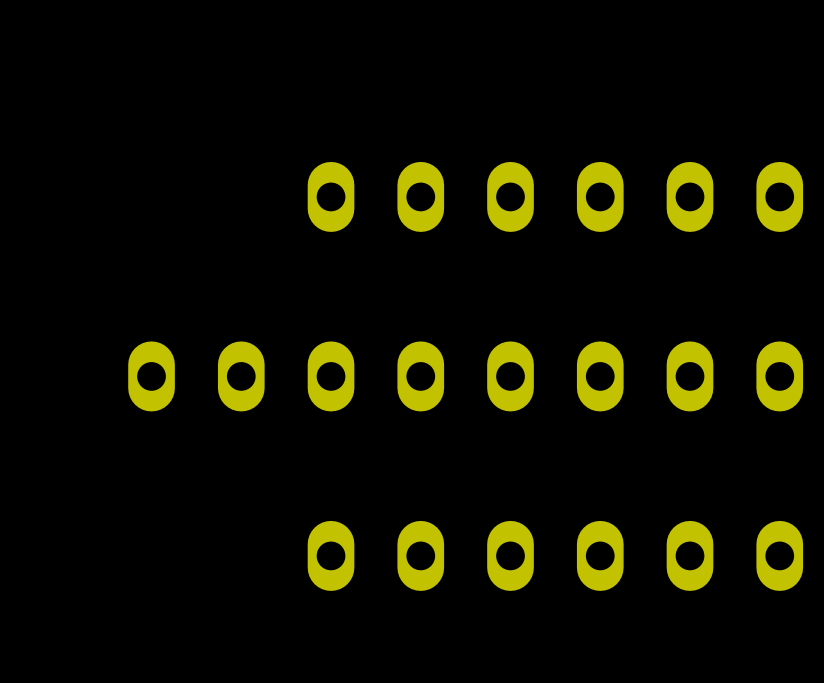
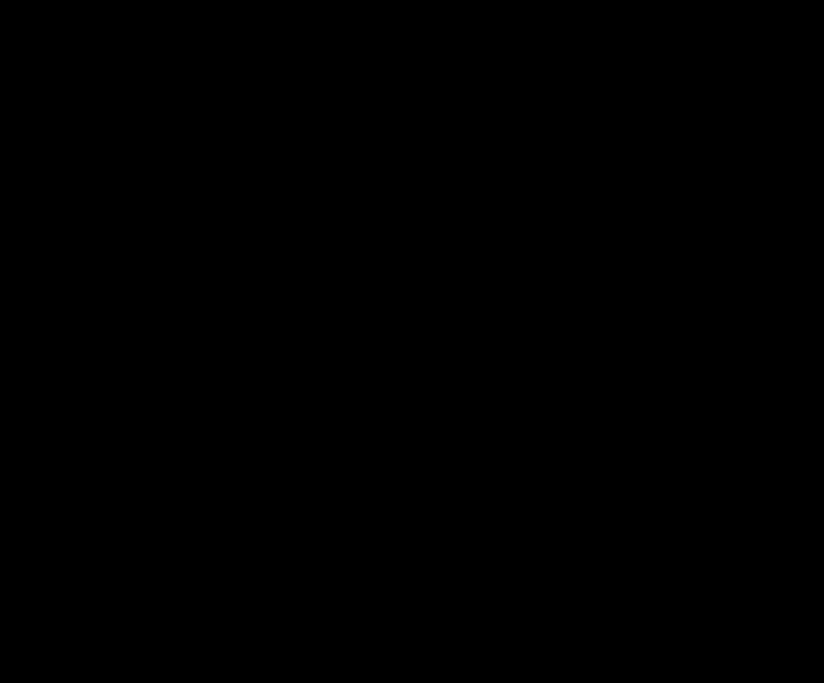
part: (555, 196) -> none
part: (465, 376) -> none
part: (555, 555) -> none

